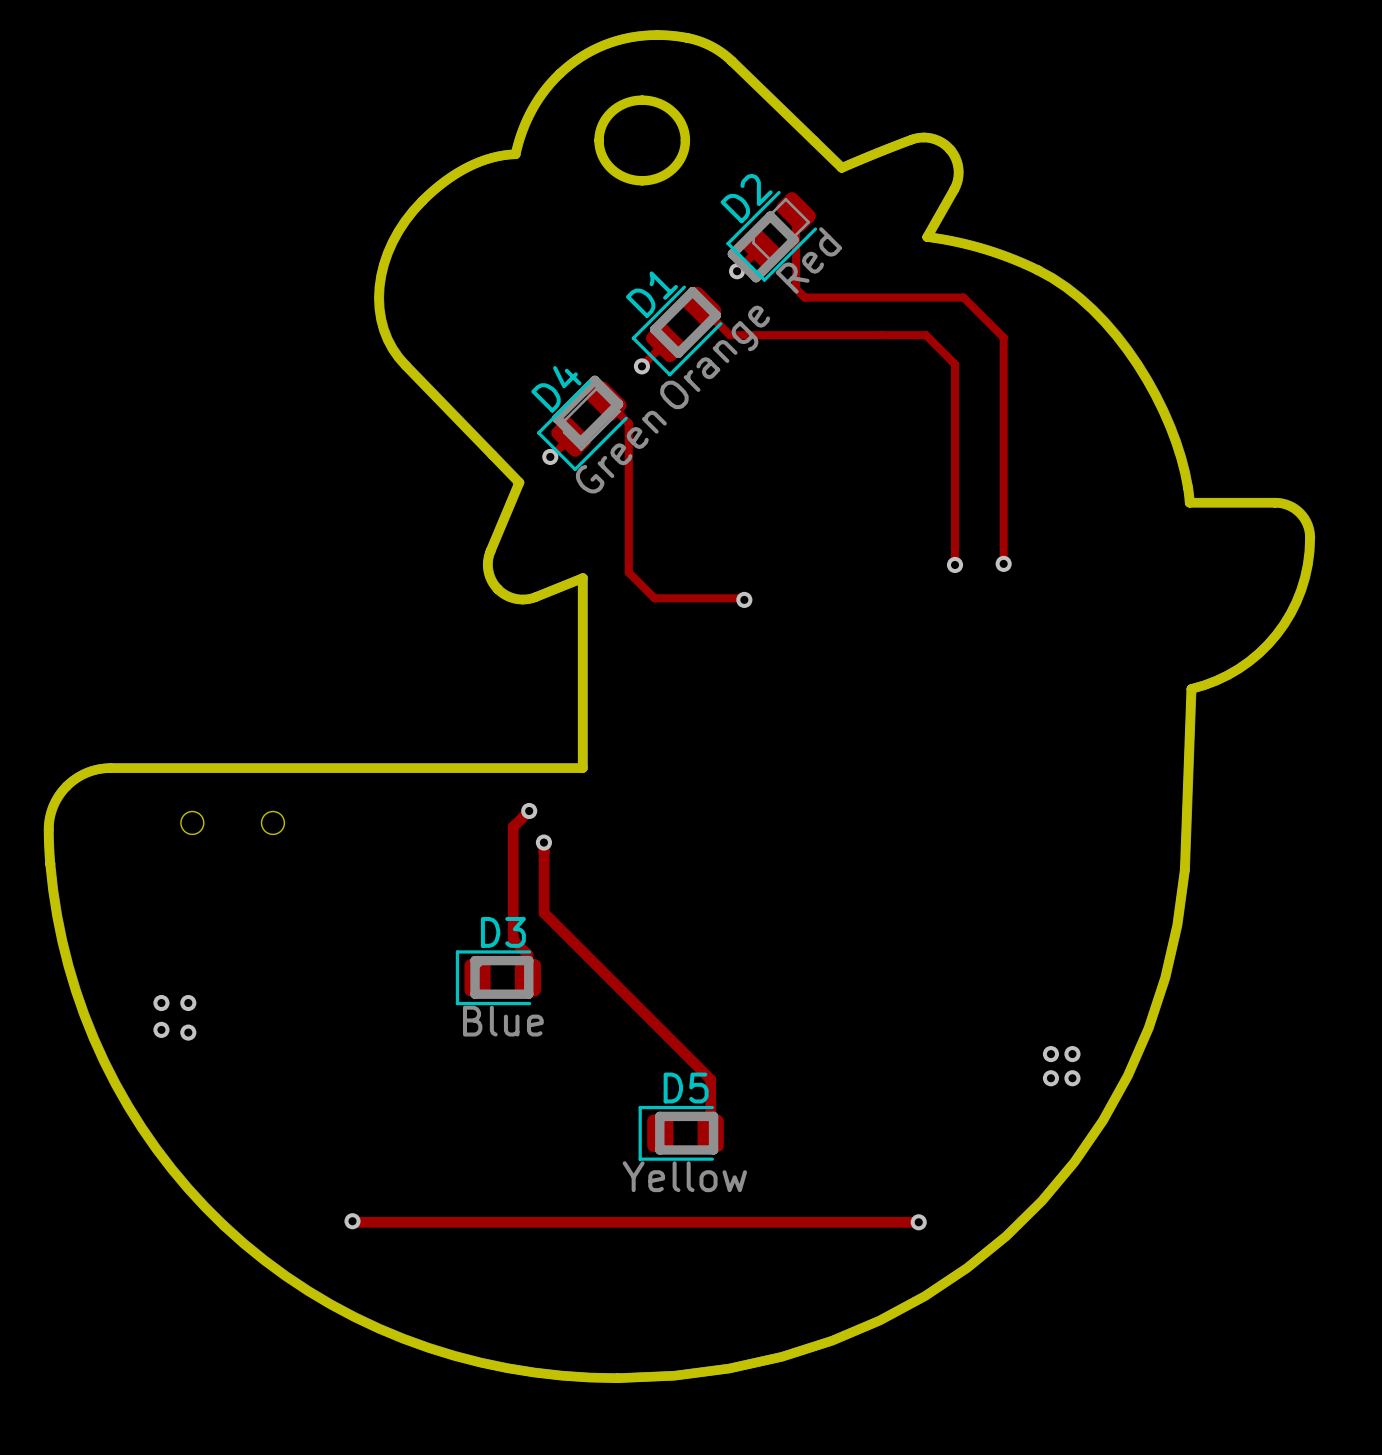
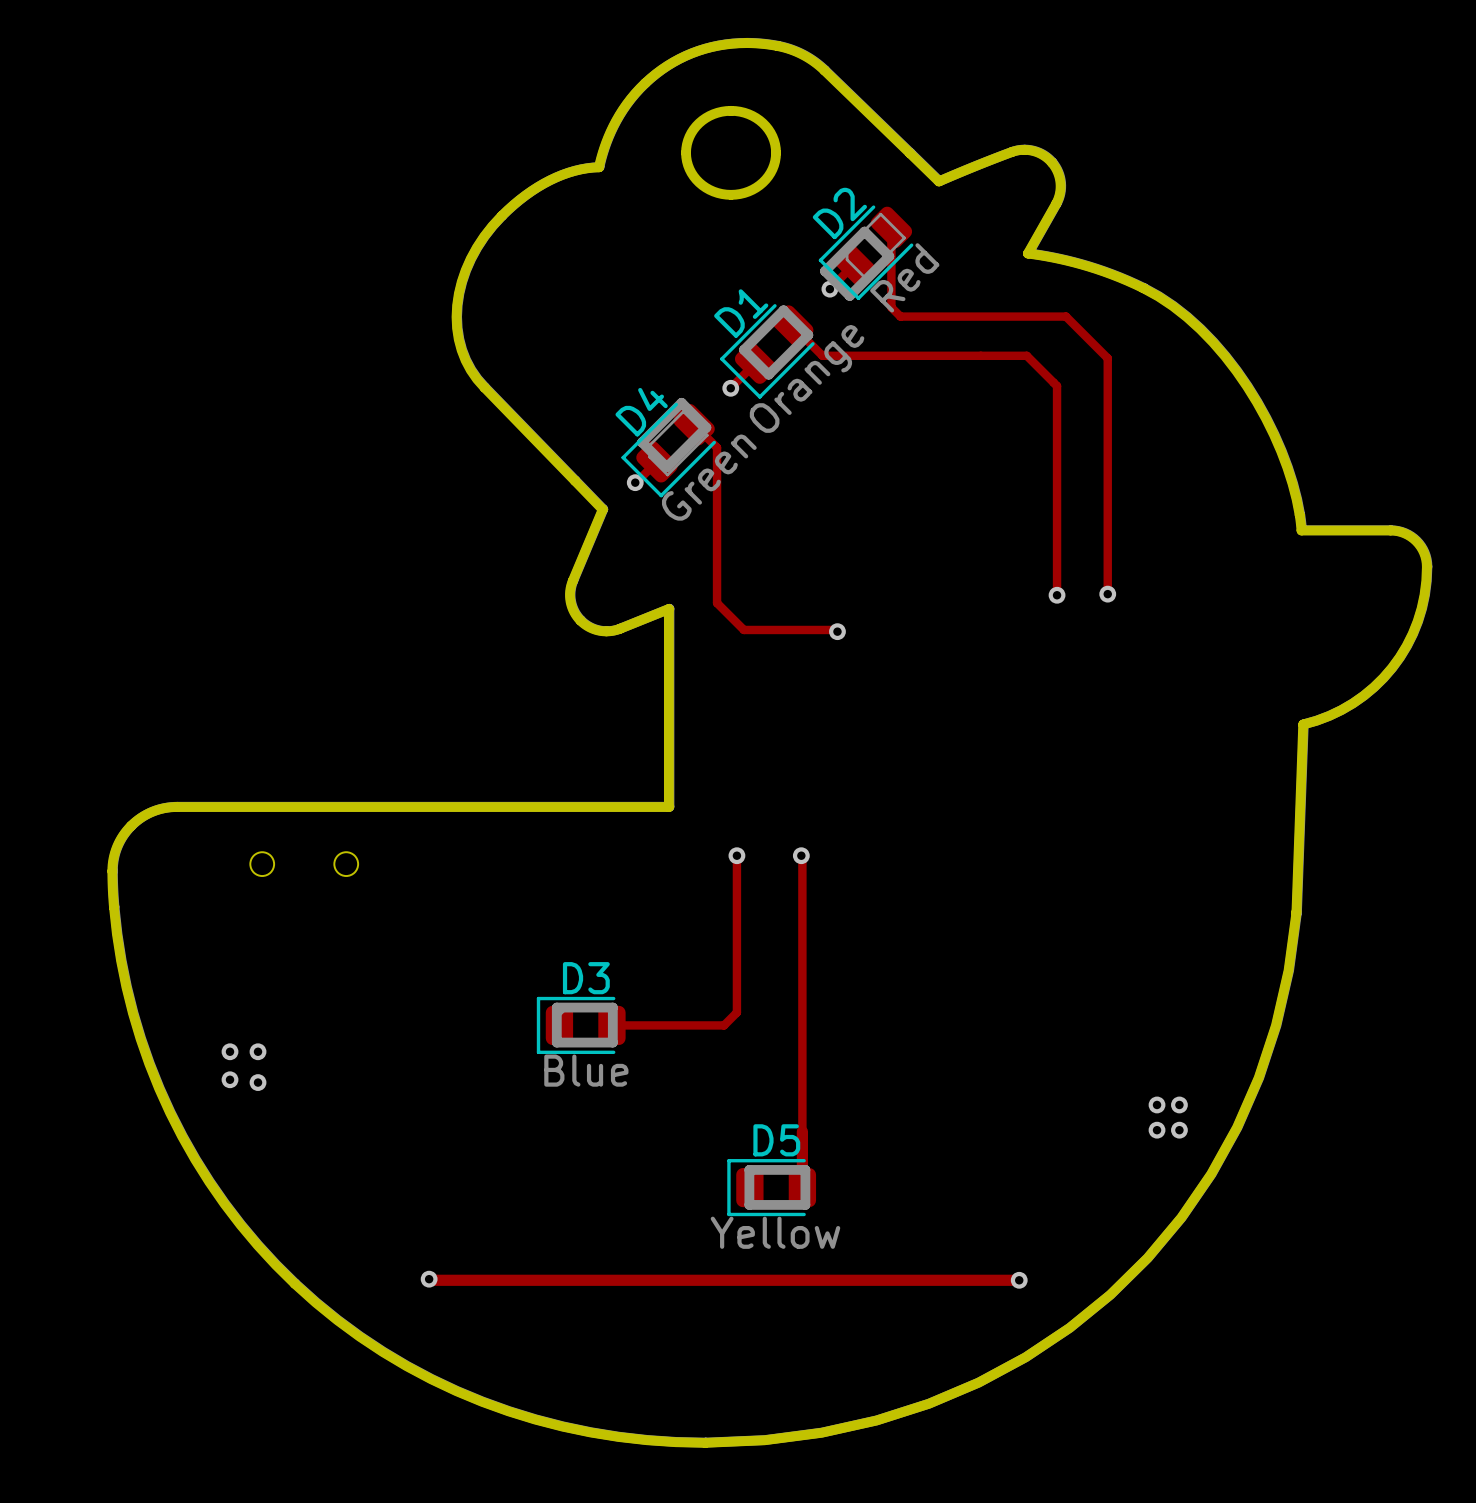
track: (529, 811) (513, 826) (513, 940) (527, 954) (527, 977) -> (736, 855) (736, 1012) (724, 1025) (611, 1025)
via: (529, 811) -> none
via: none -> (736, 855)
via: none -> (801, 855)
via: (543, 842) -> none
track: (544, 851) (544, 912) (710, 1079) -> (801, 855) (802, 1131)

